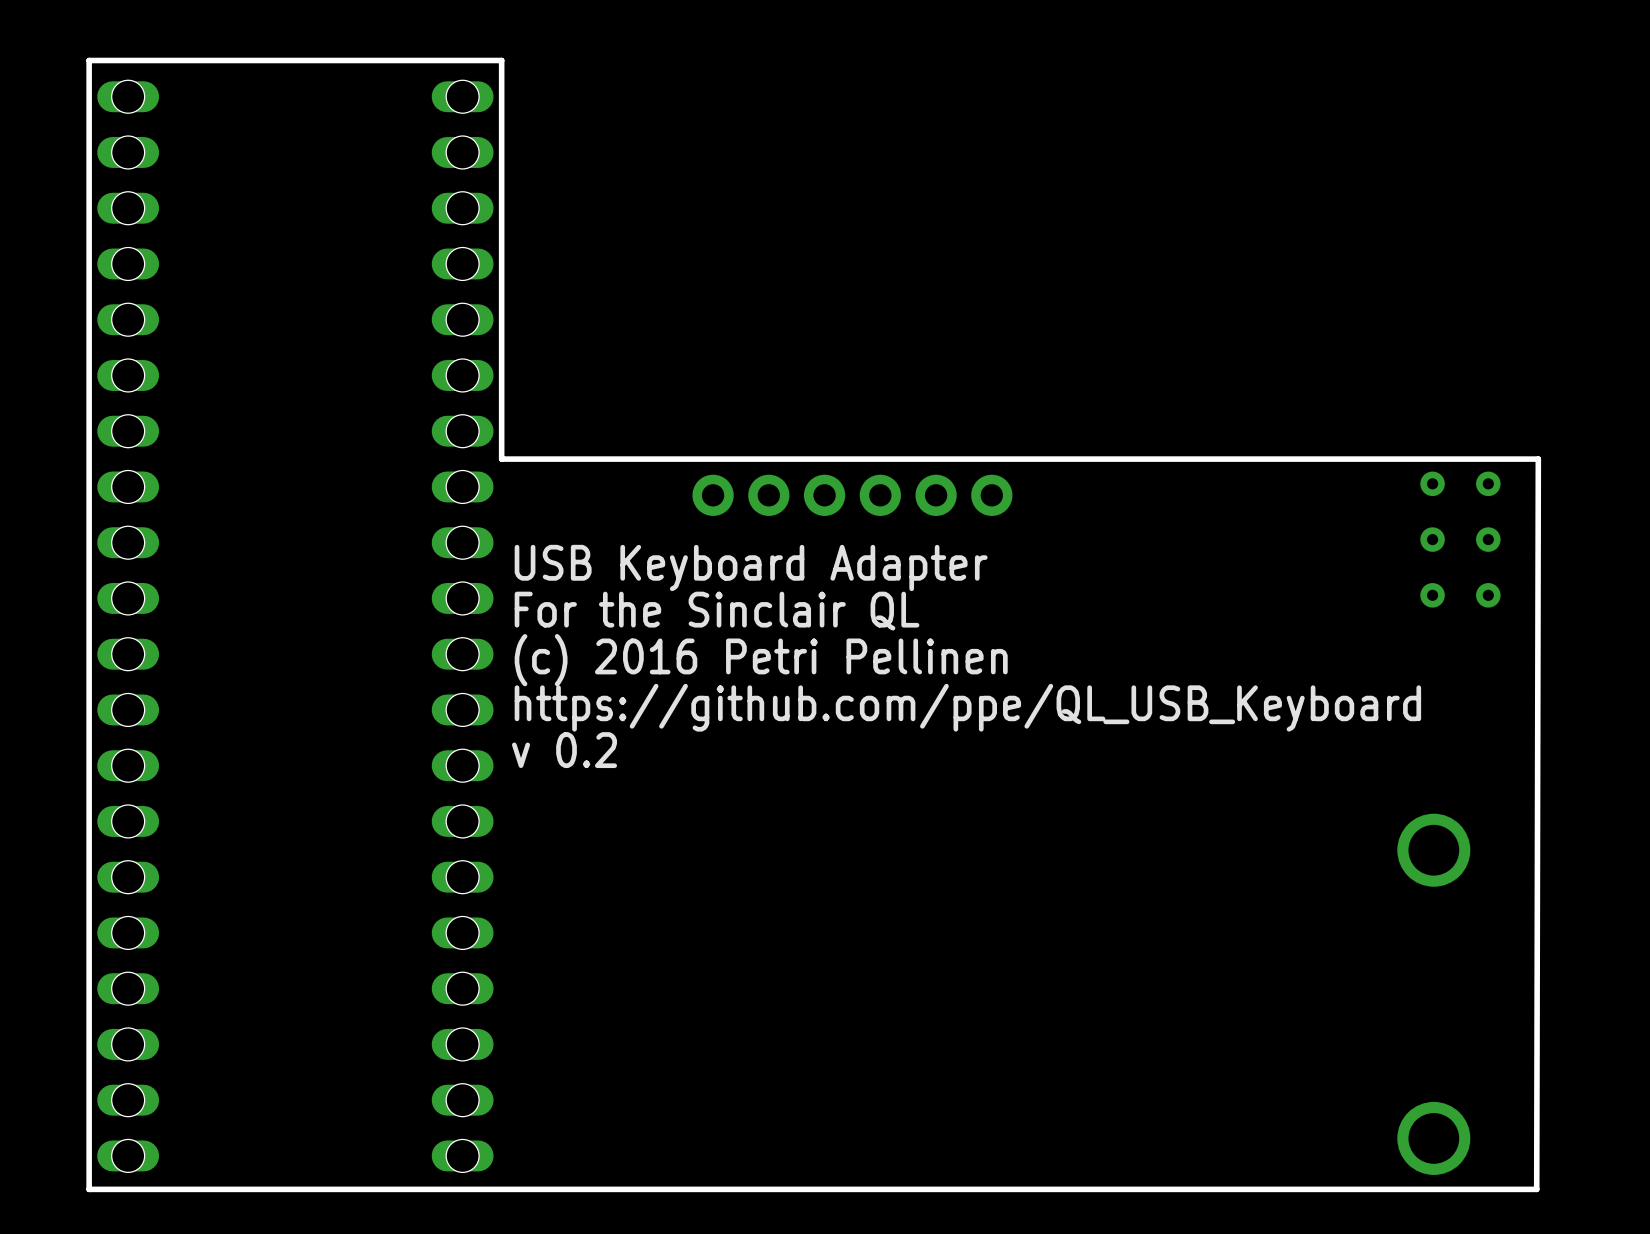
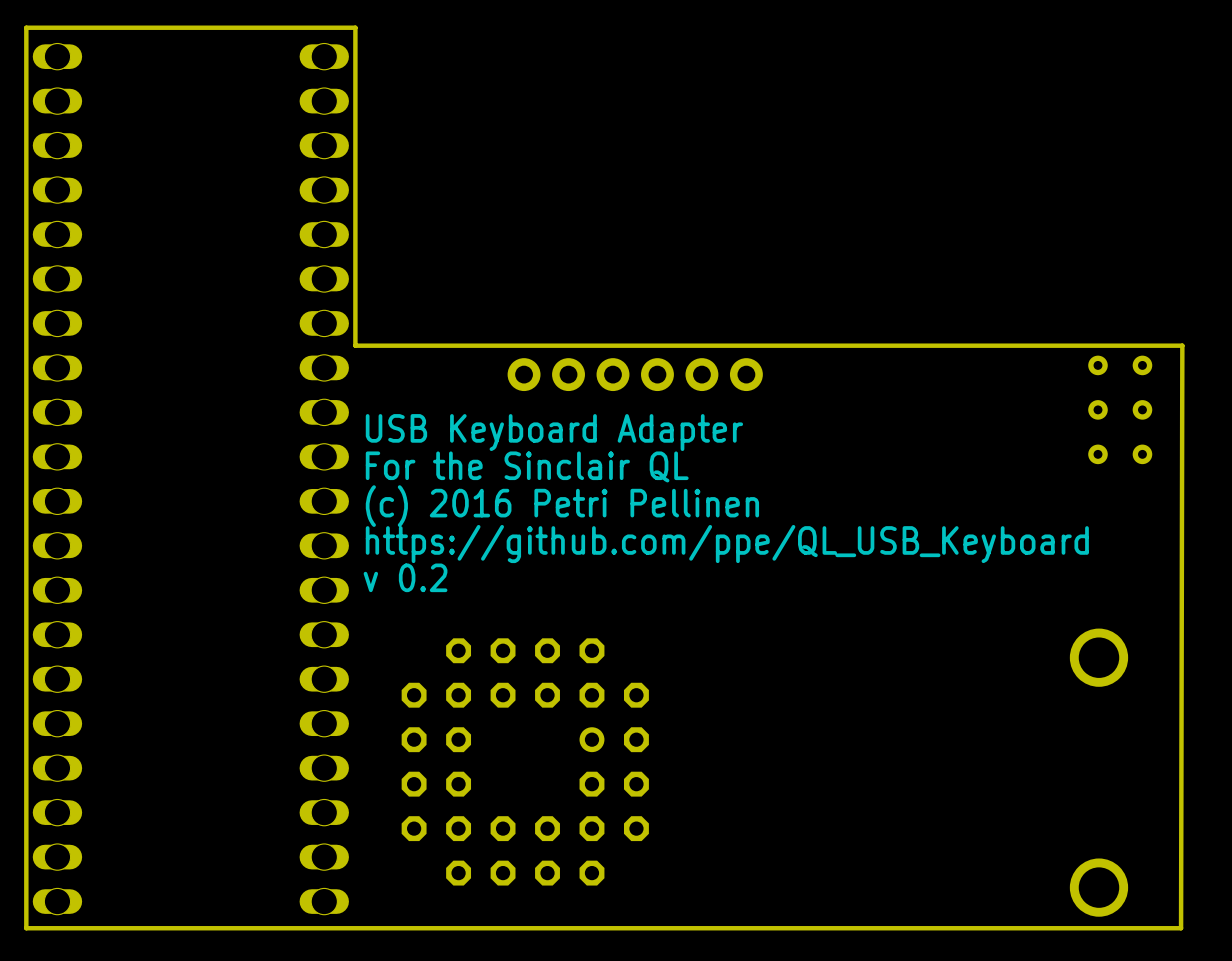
part: none -> (525, 761)

